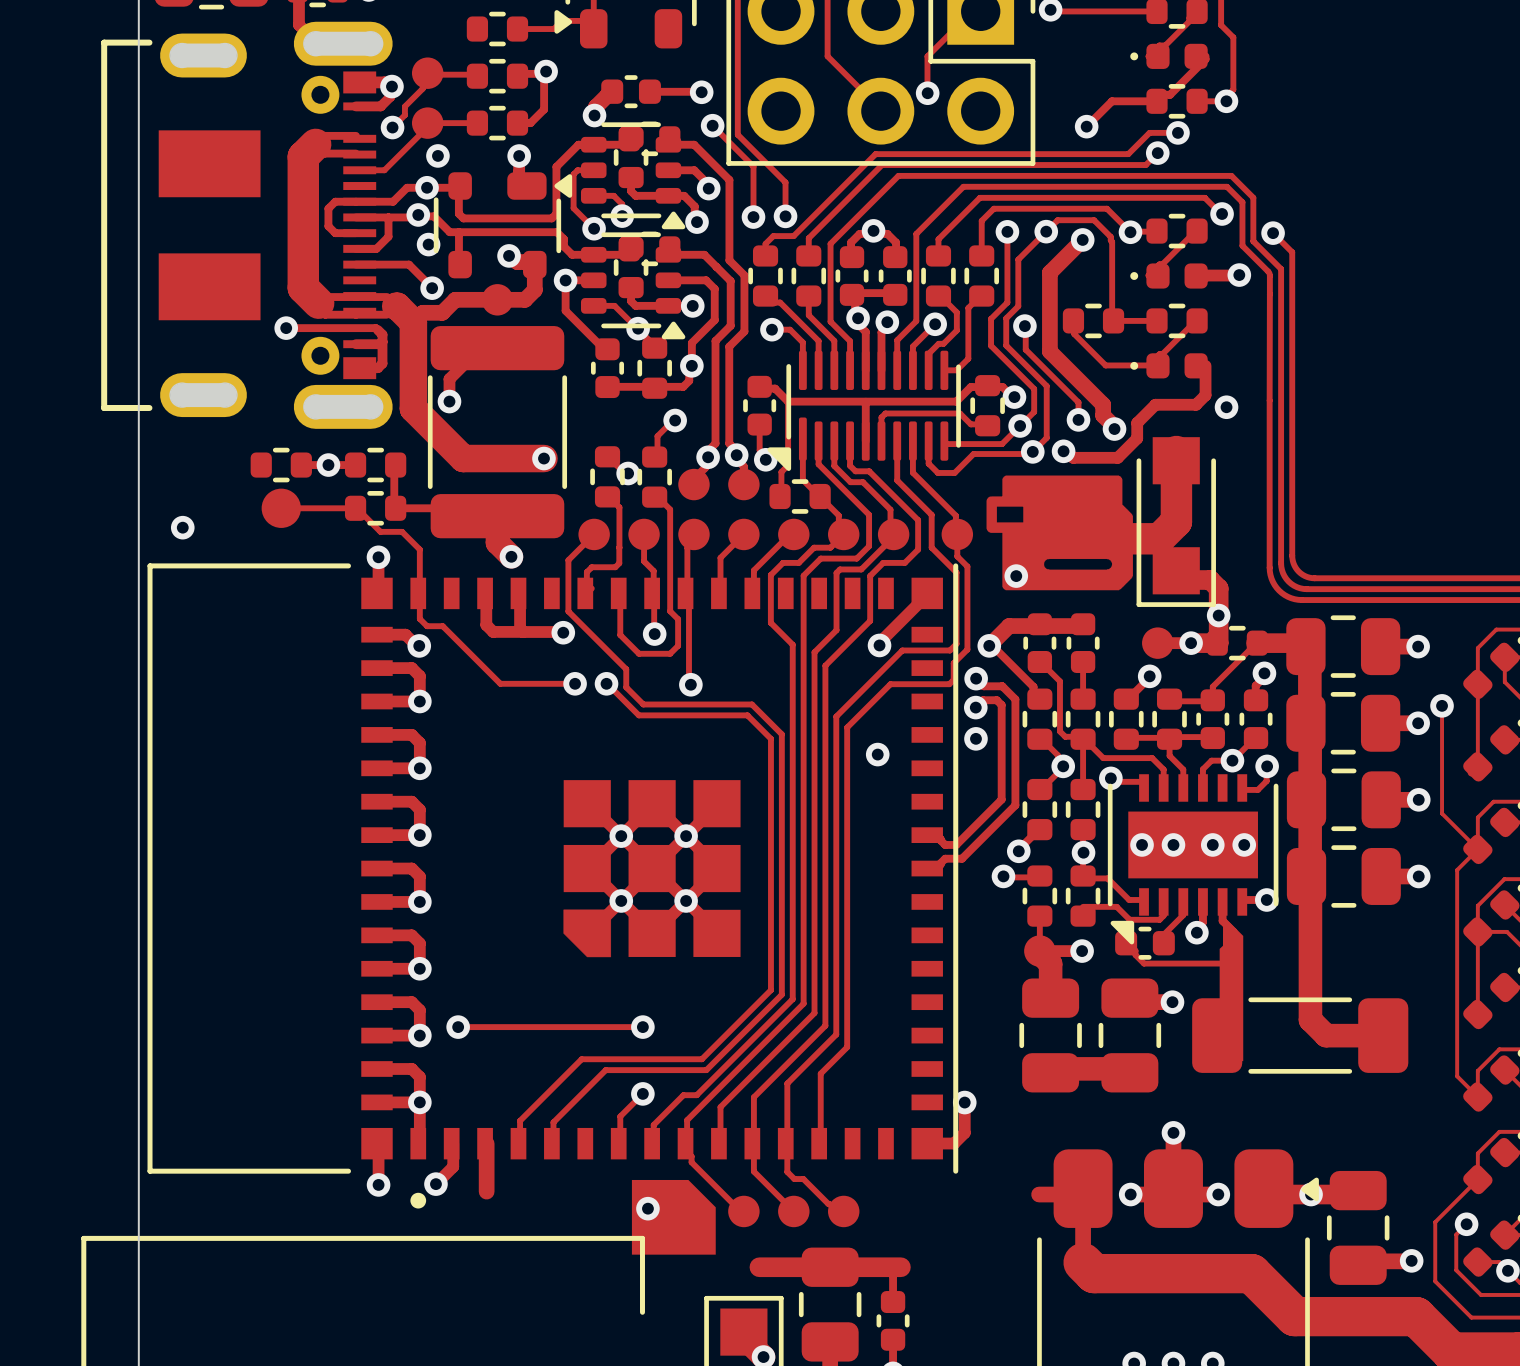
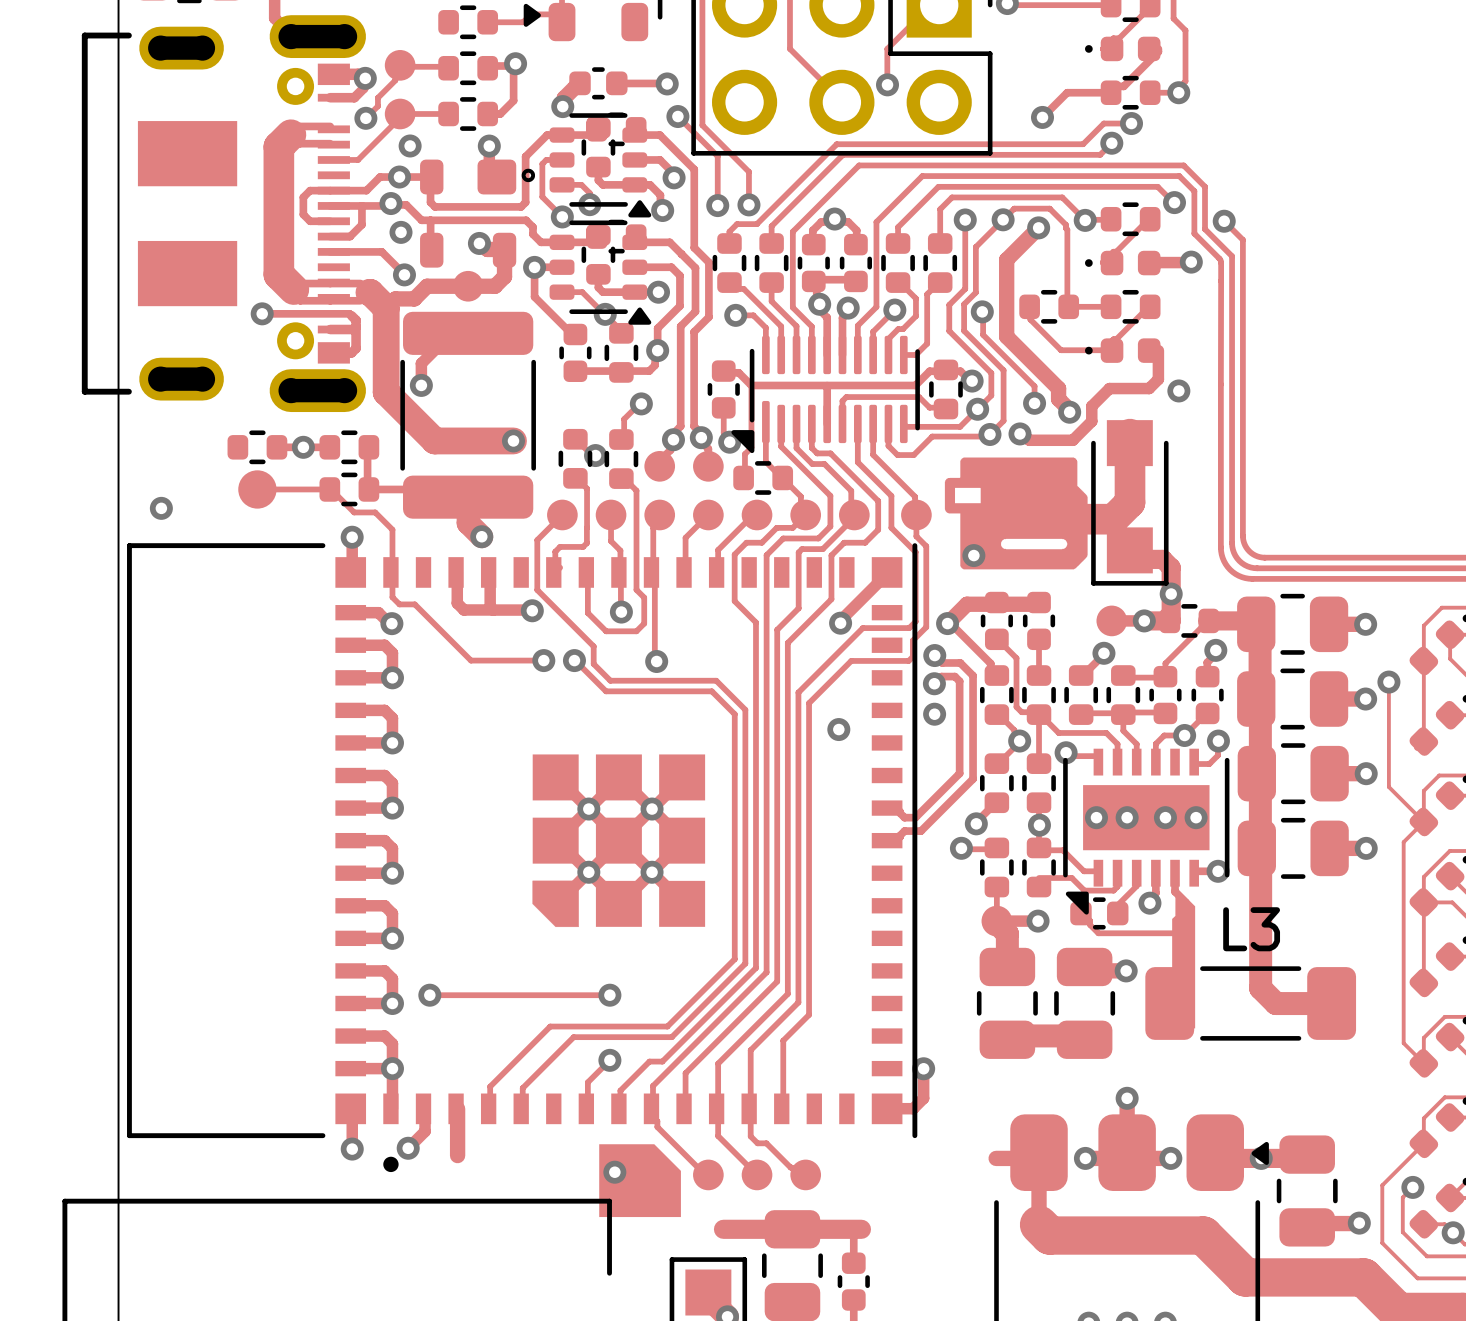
part footprint: [433, 172, 573, 279] -> [420, 159, 536, 268]
L3 name: none -> L3 (1251, 929)

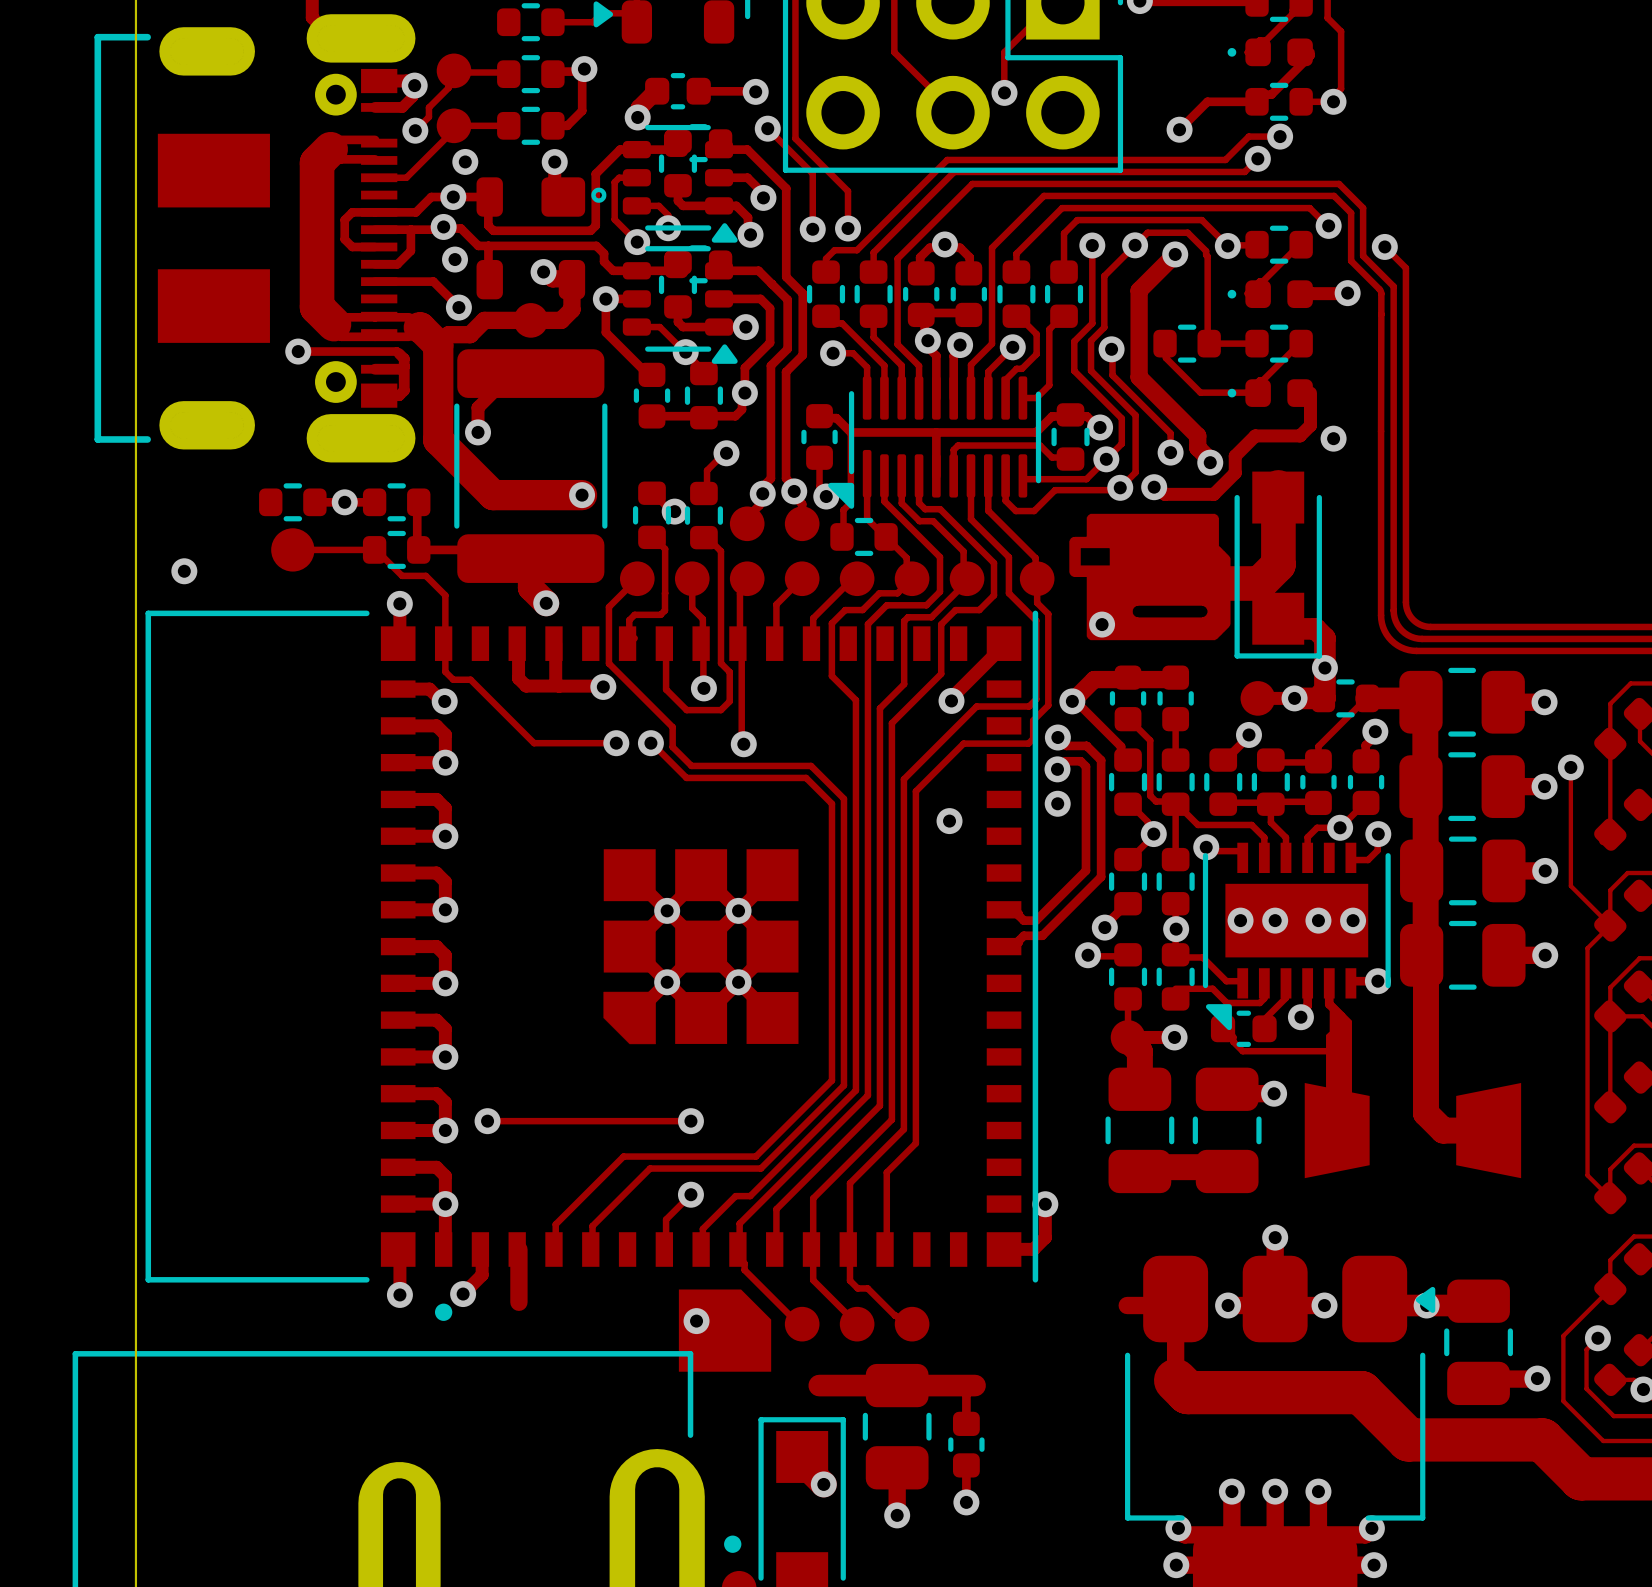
part: none -> (1412, 1130)
L3: (1250, 1003) -> none

